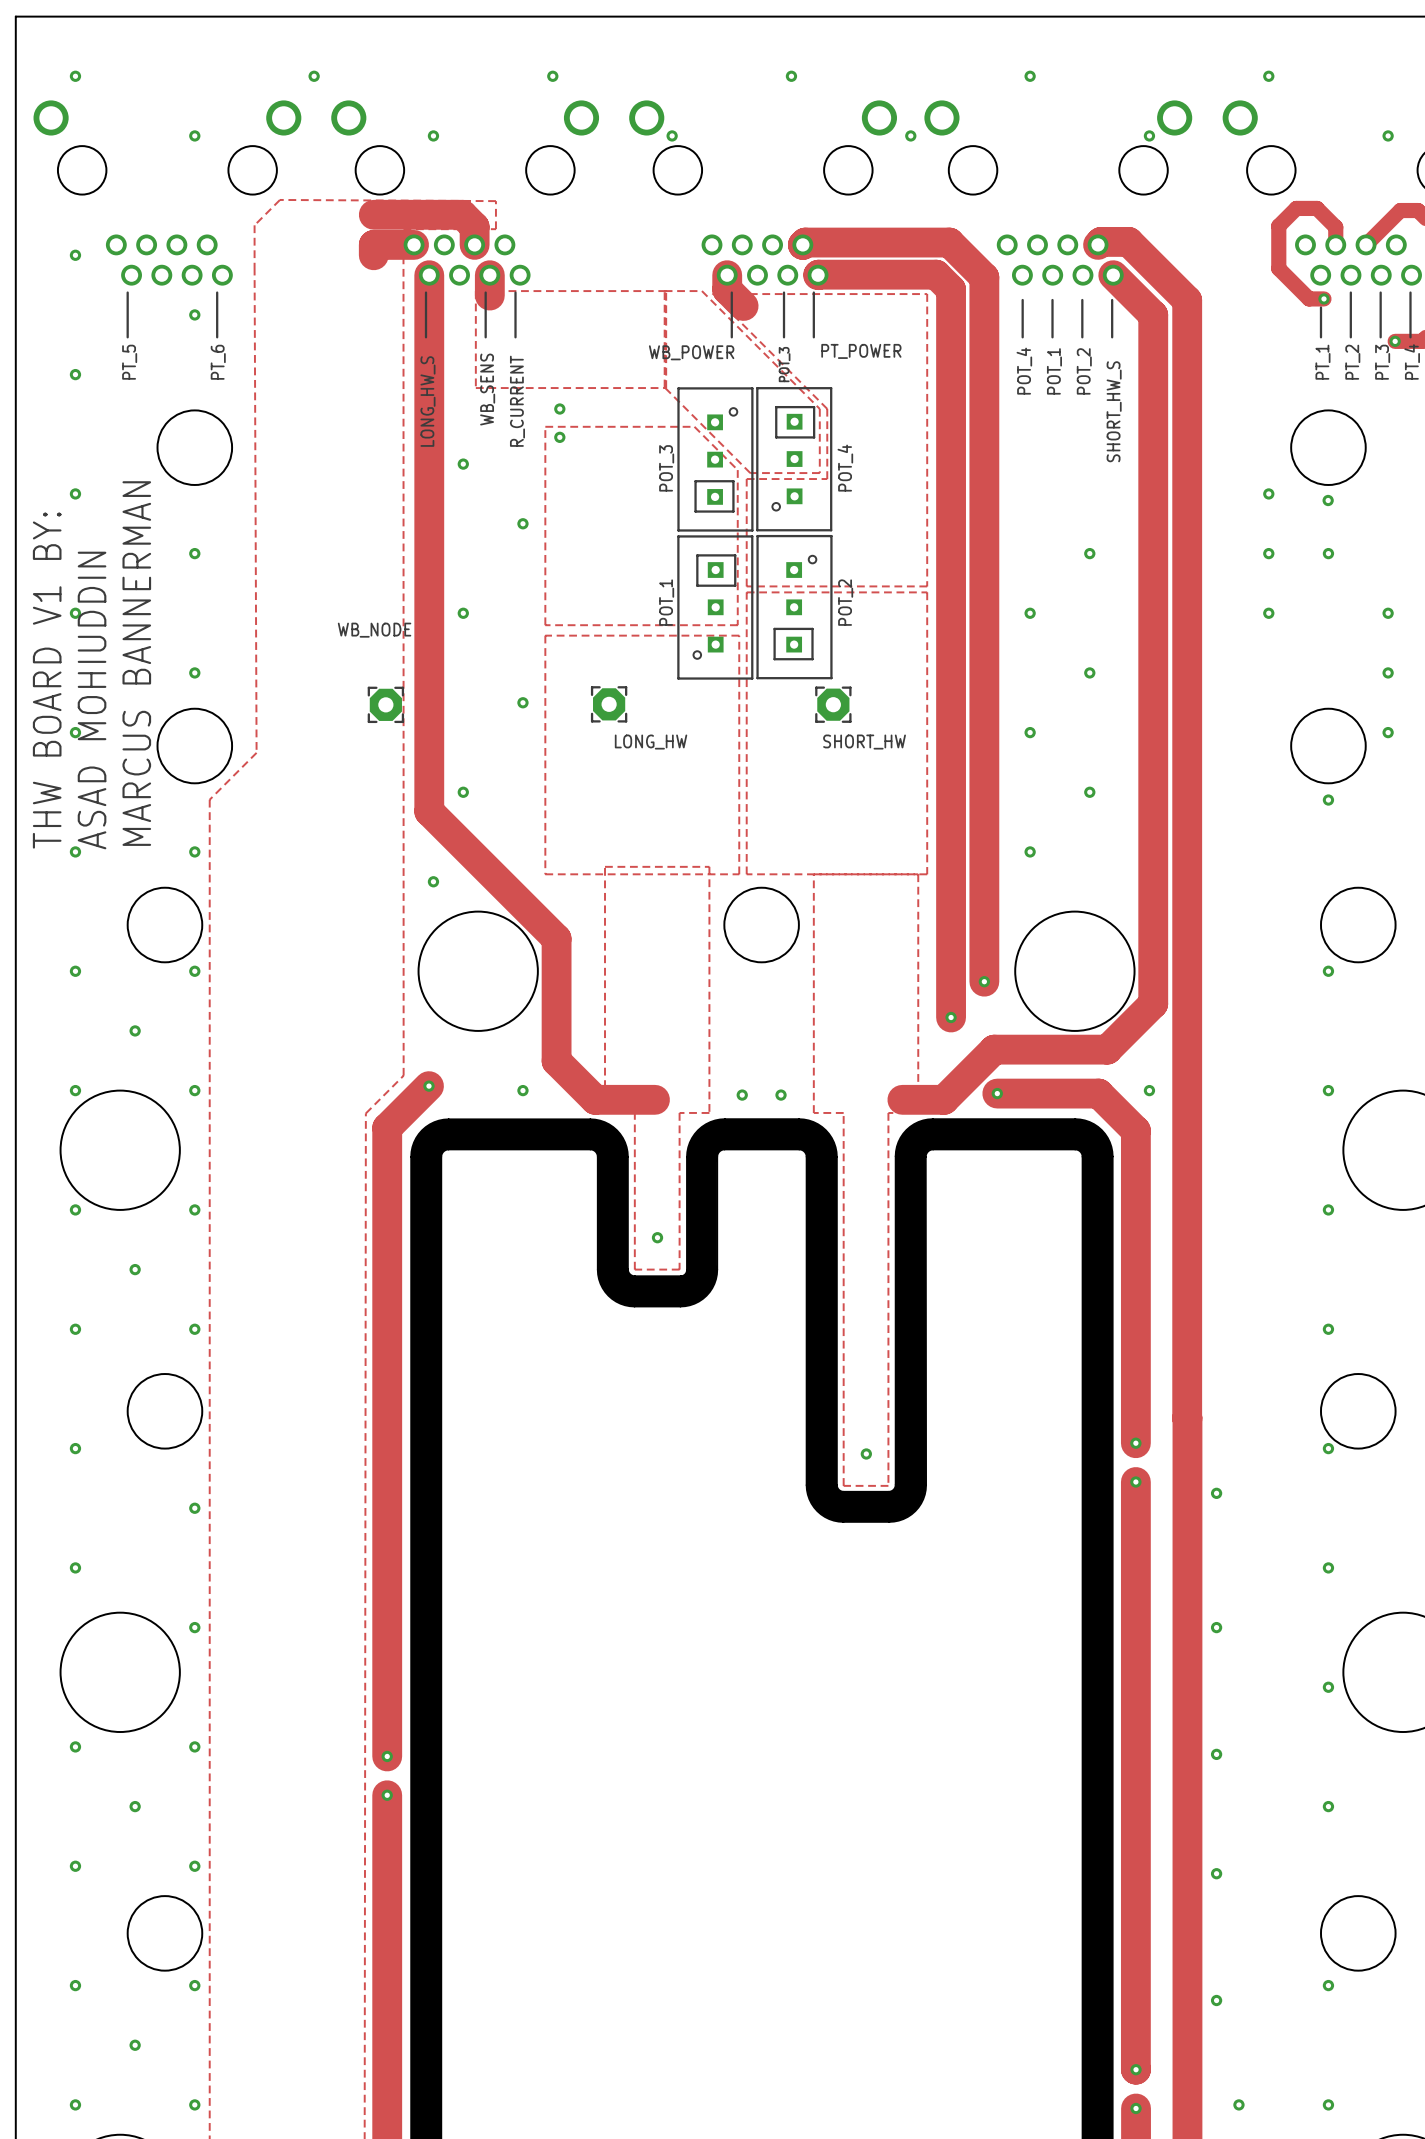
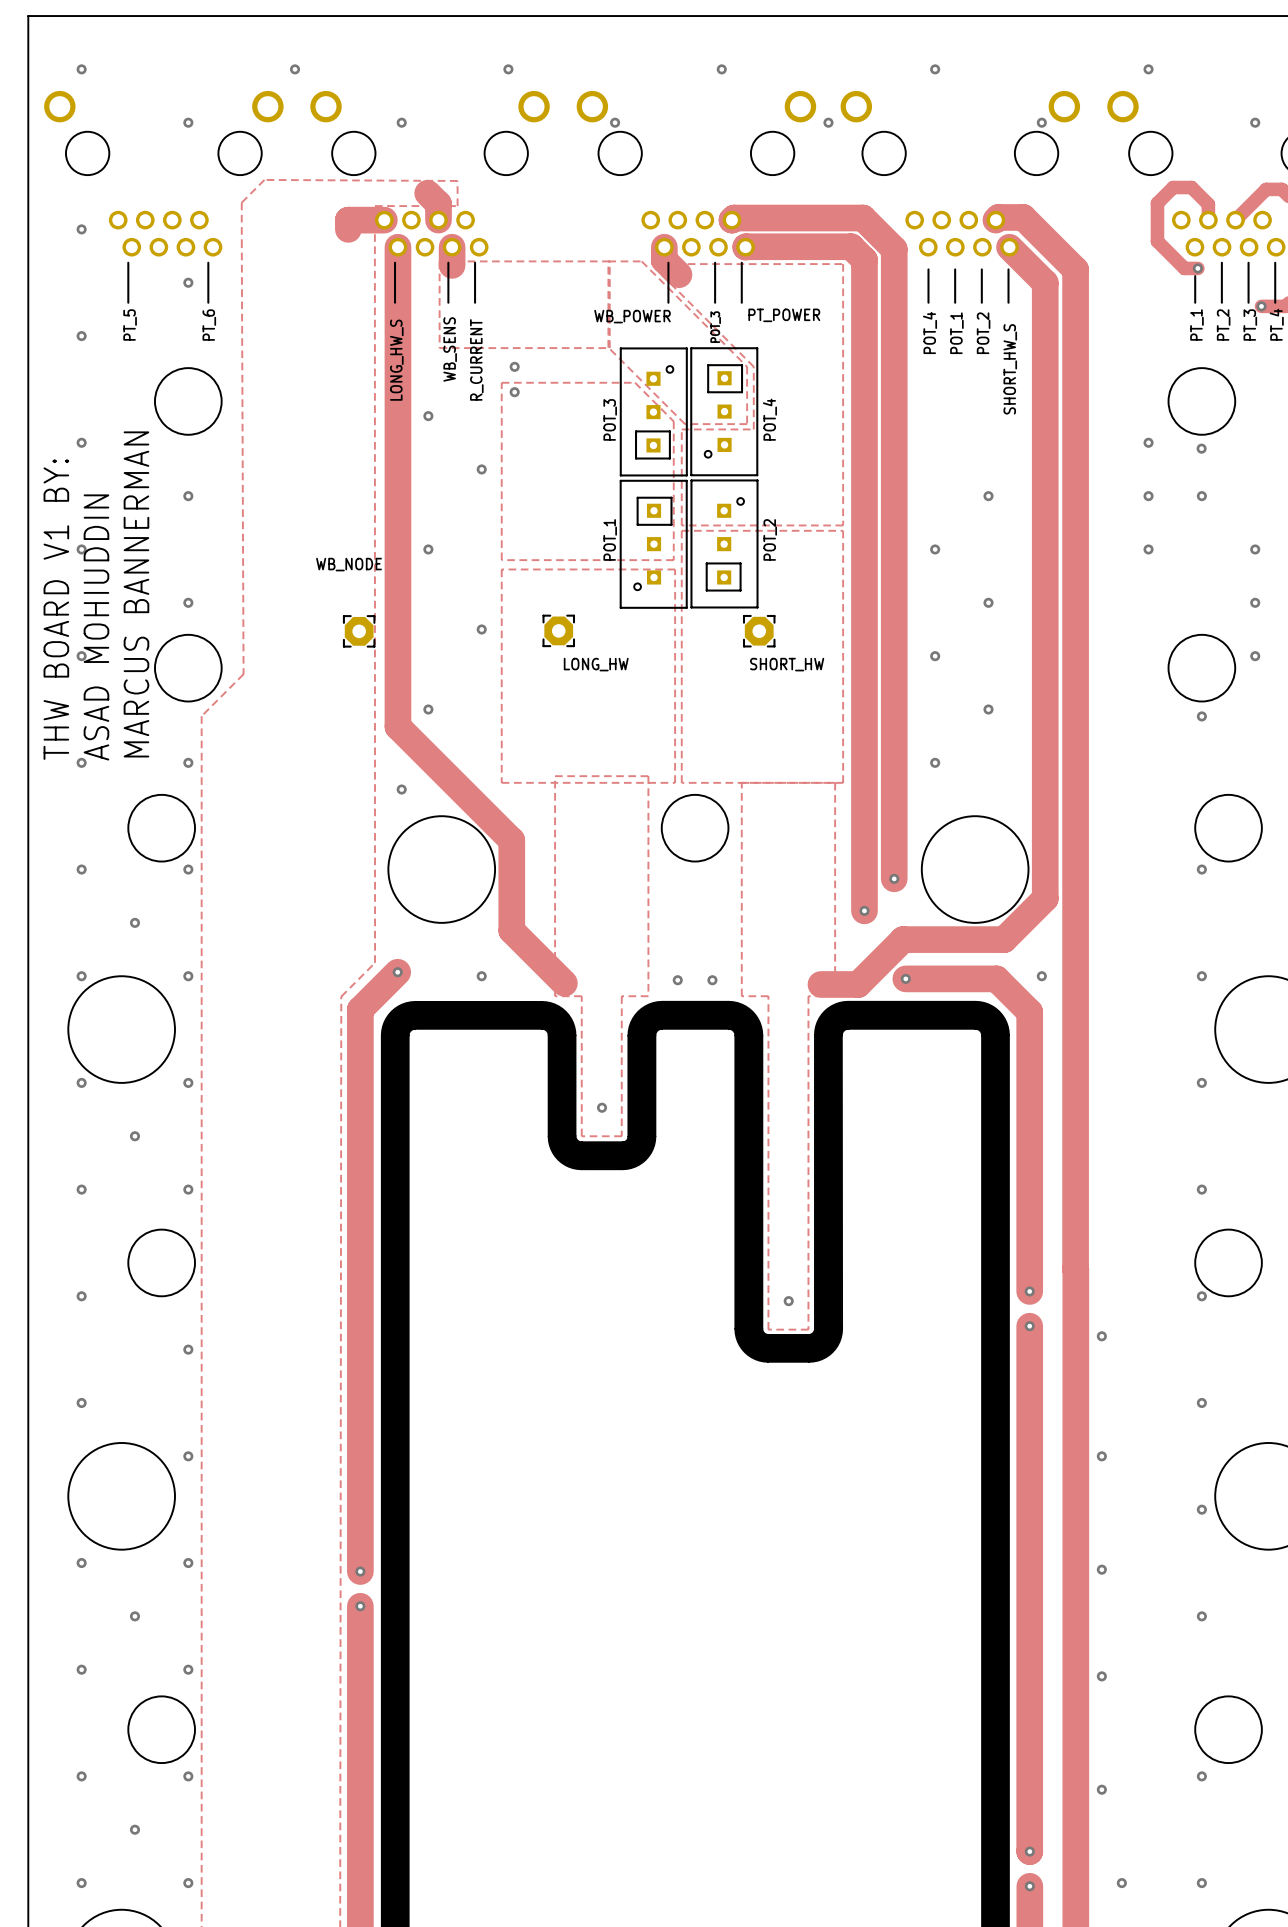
track: (373, 214) (462, 214) -> none
track: (556, 1039) (556, 1061) (595, 1099) (654, 1099) -> (511, 930) (564, 983)

